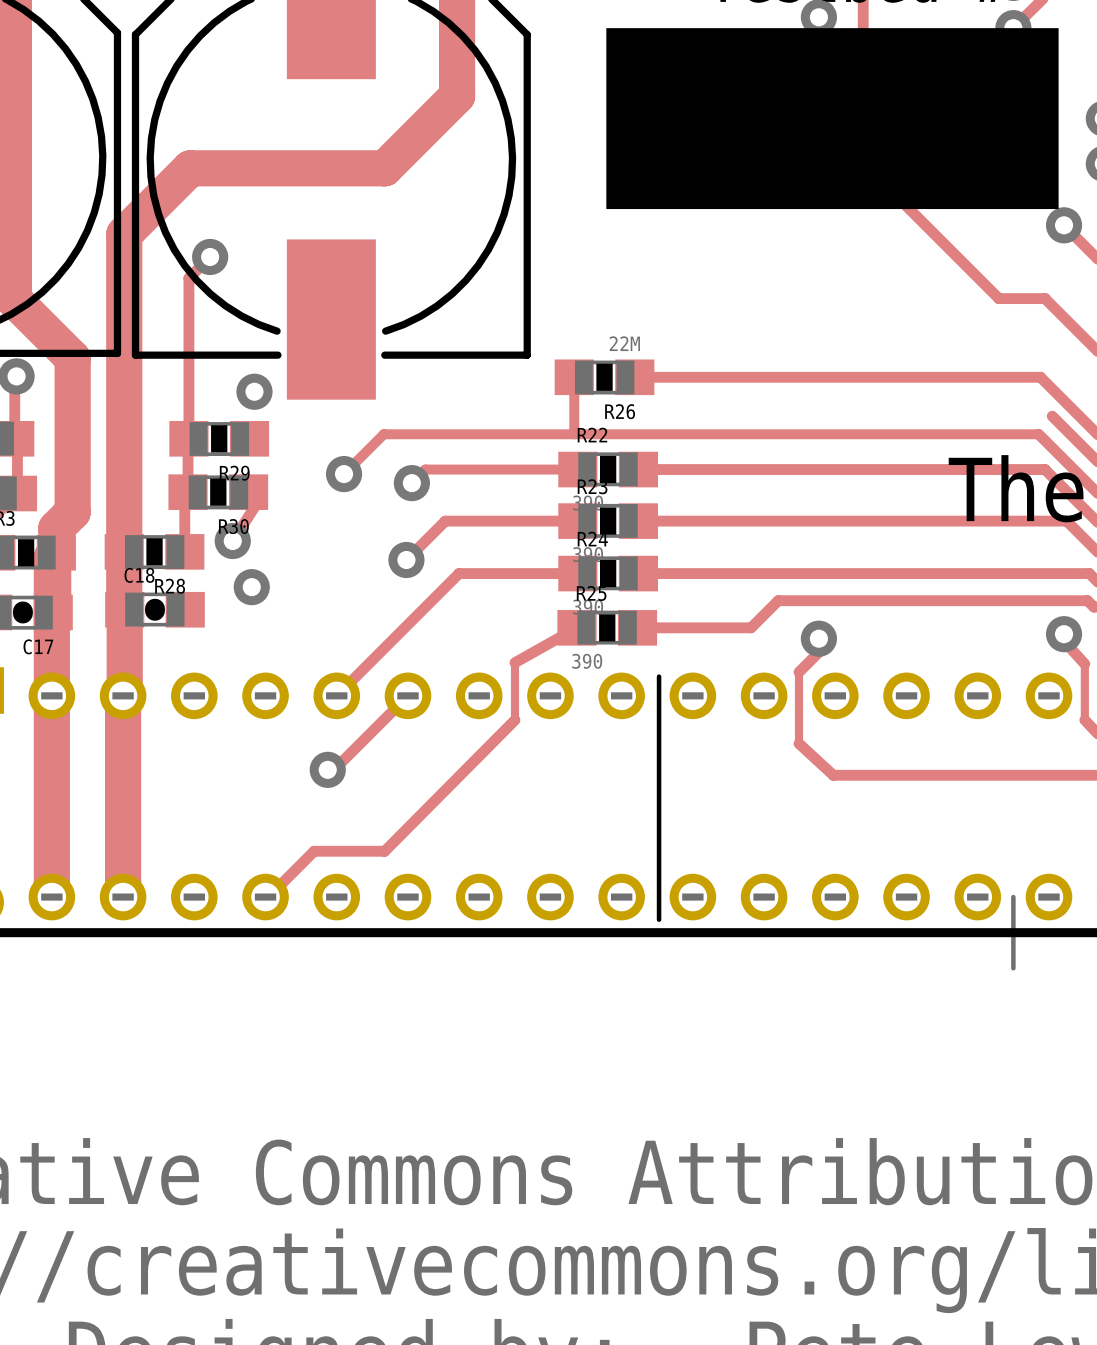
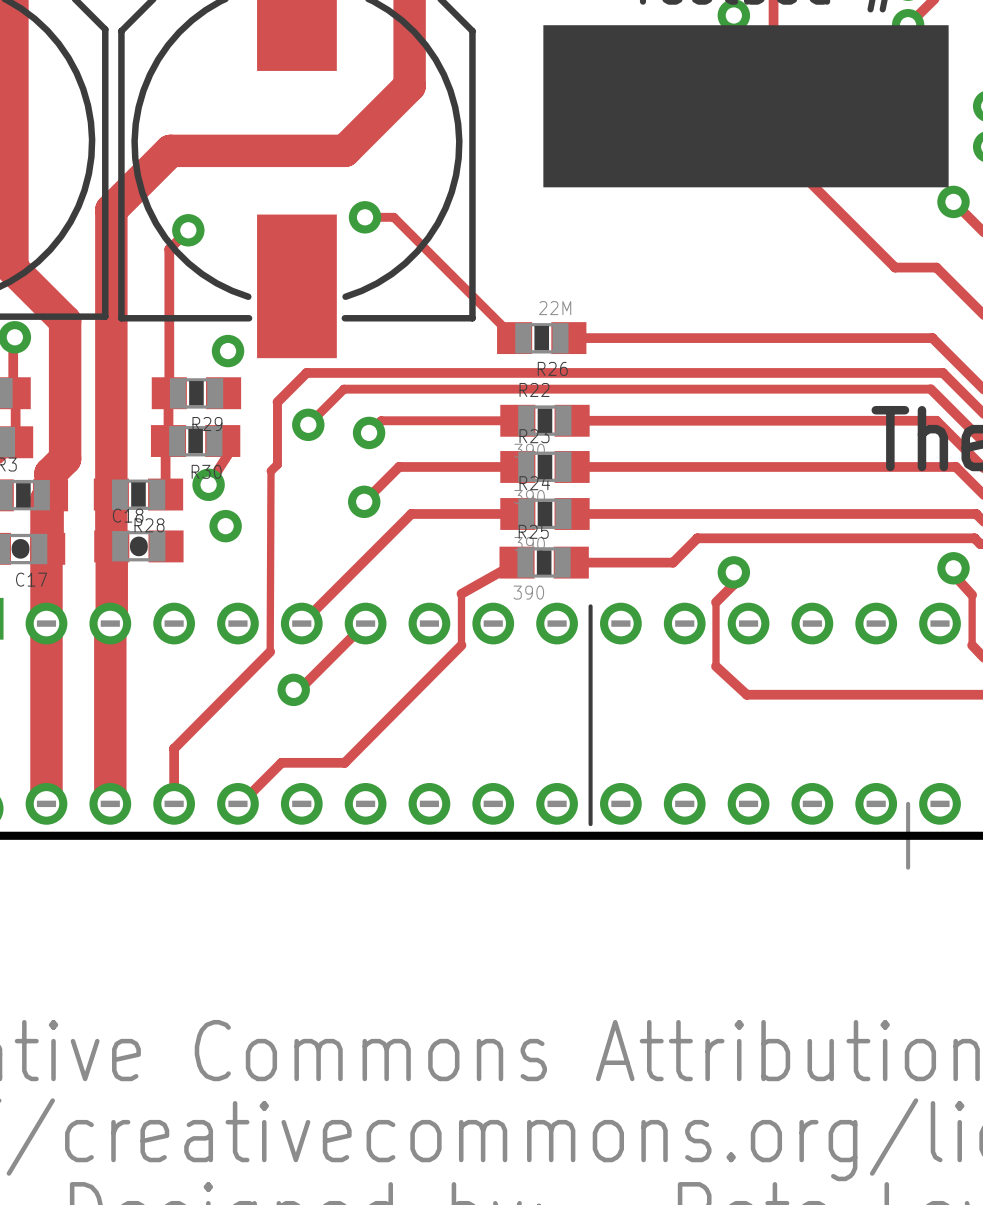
via: none -> (365, 217)
track: (574, 377) (574, 434) -> (514, 338) (393, 217) (365, 217)
track: none -> (942, 372) (306, 372) (277, 402) (277, 464) (271, 471) (270, 651) (174, 748) (174, 803)

